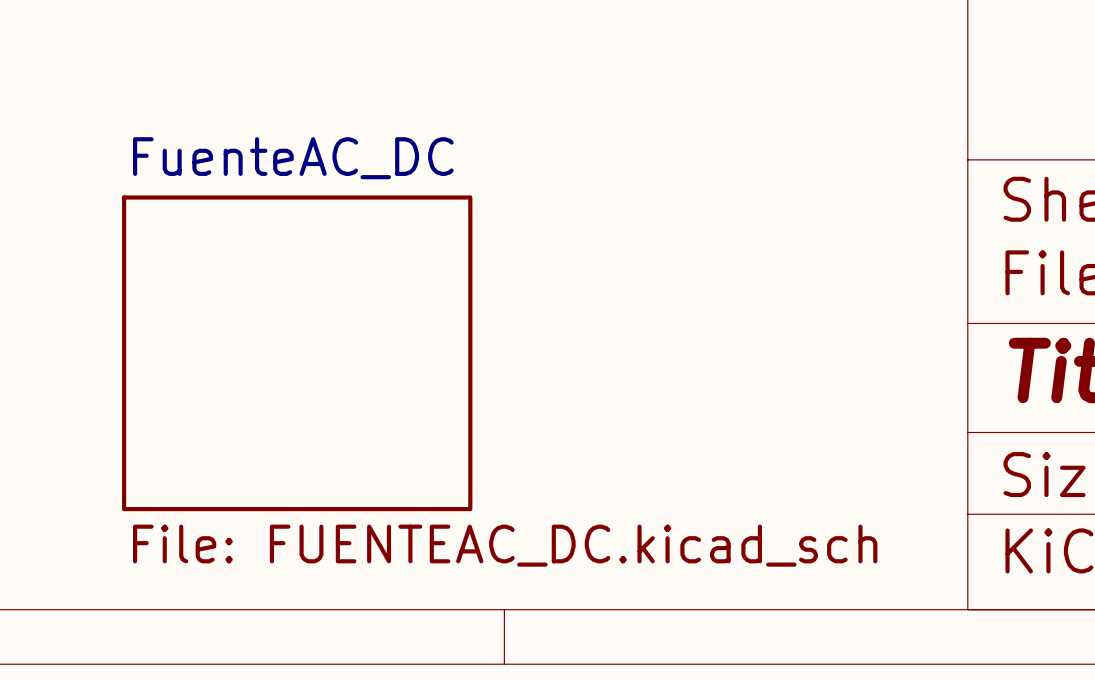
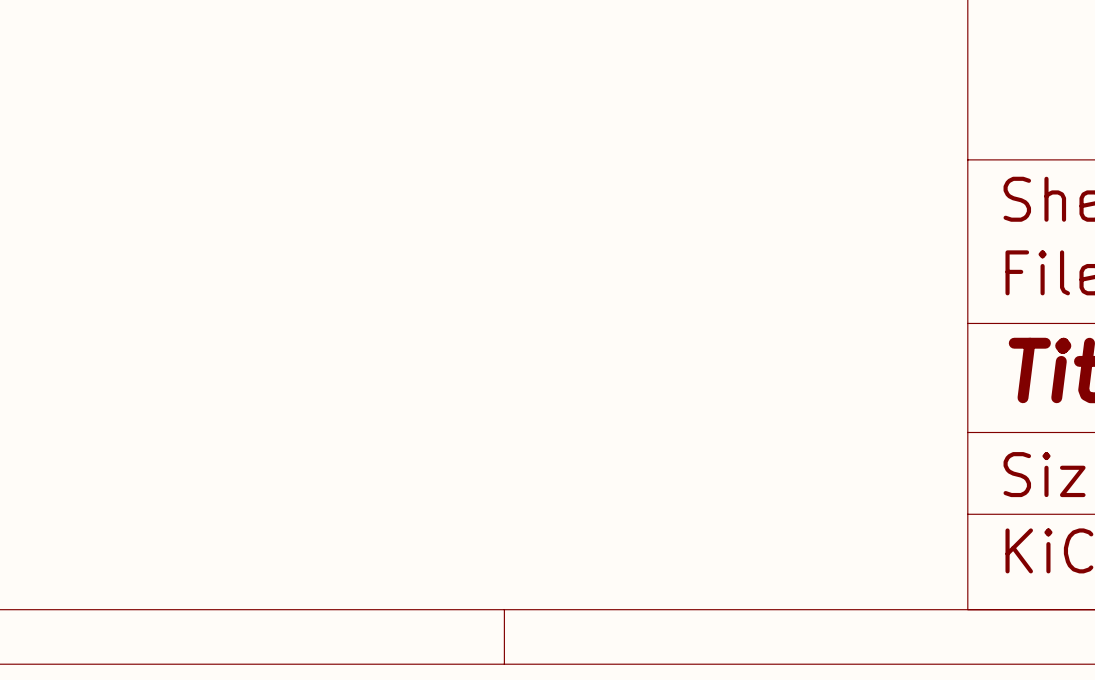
sheet FuenteAC_DC: File: FUENTEAC_DC.kicad_sch (297, 353) -> none

